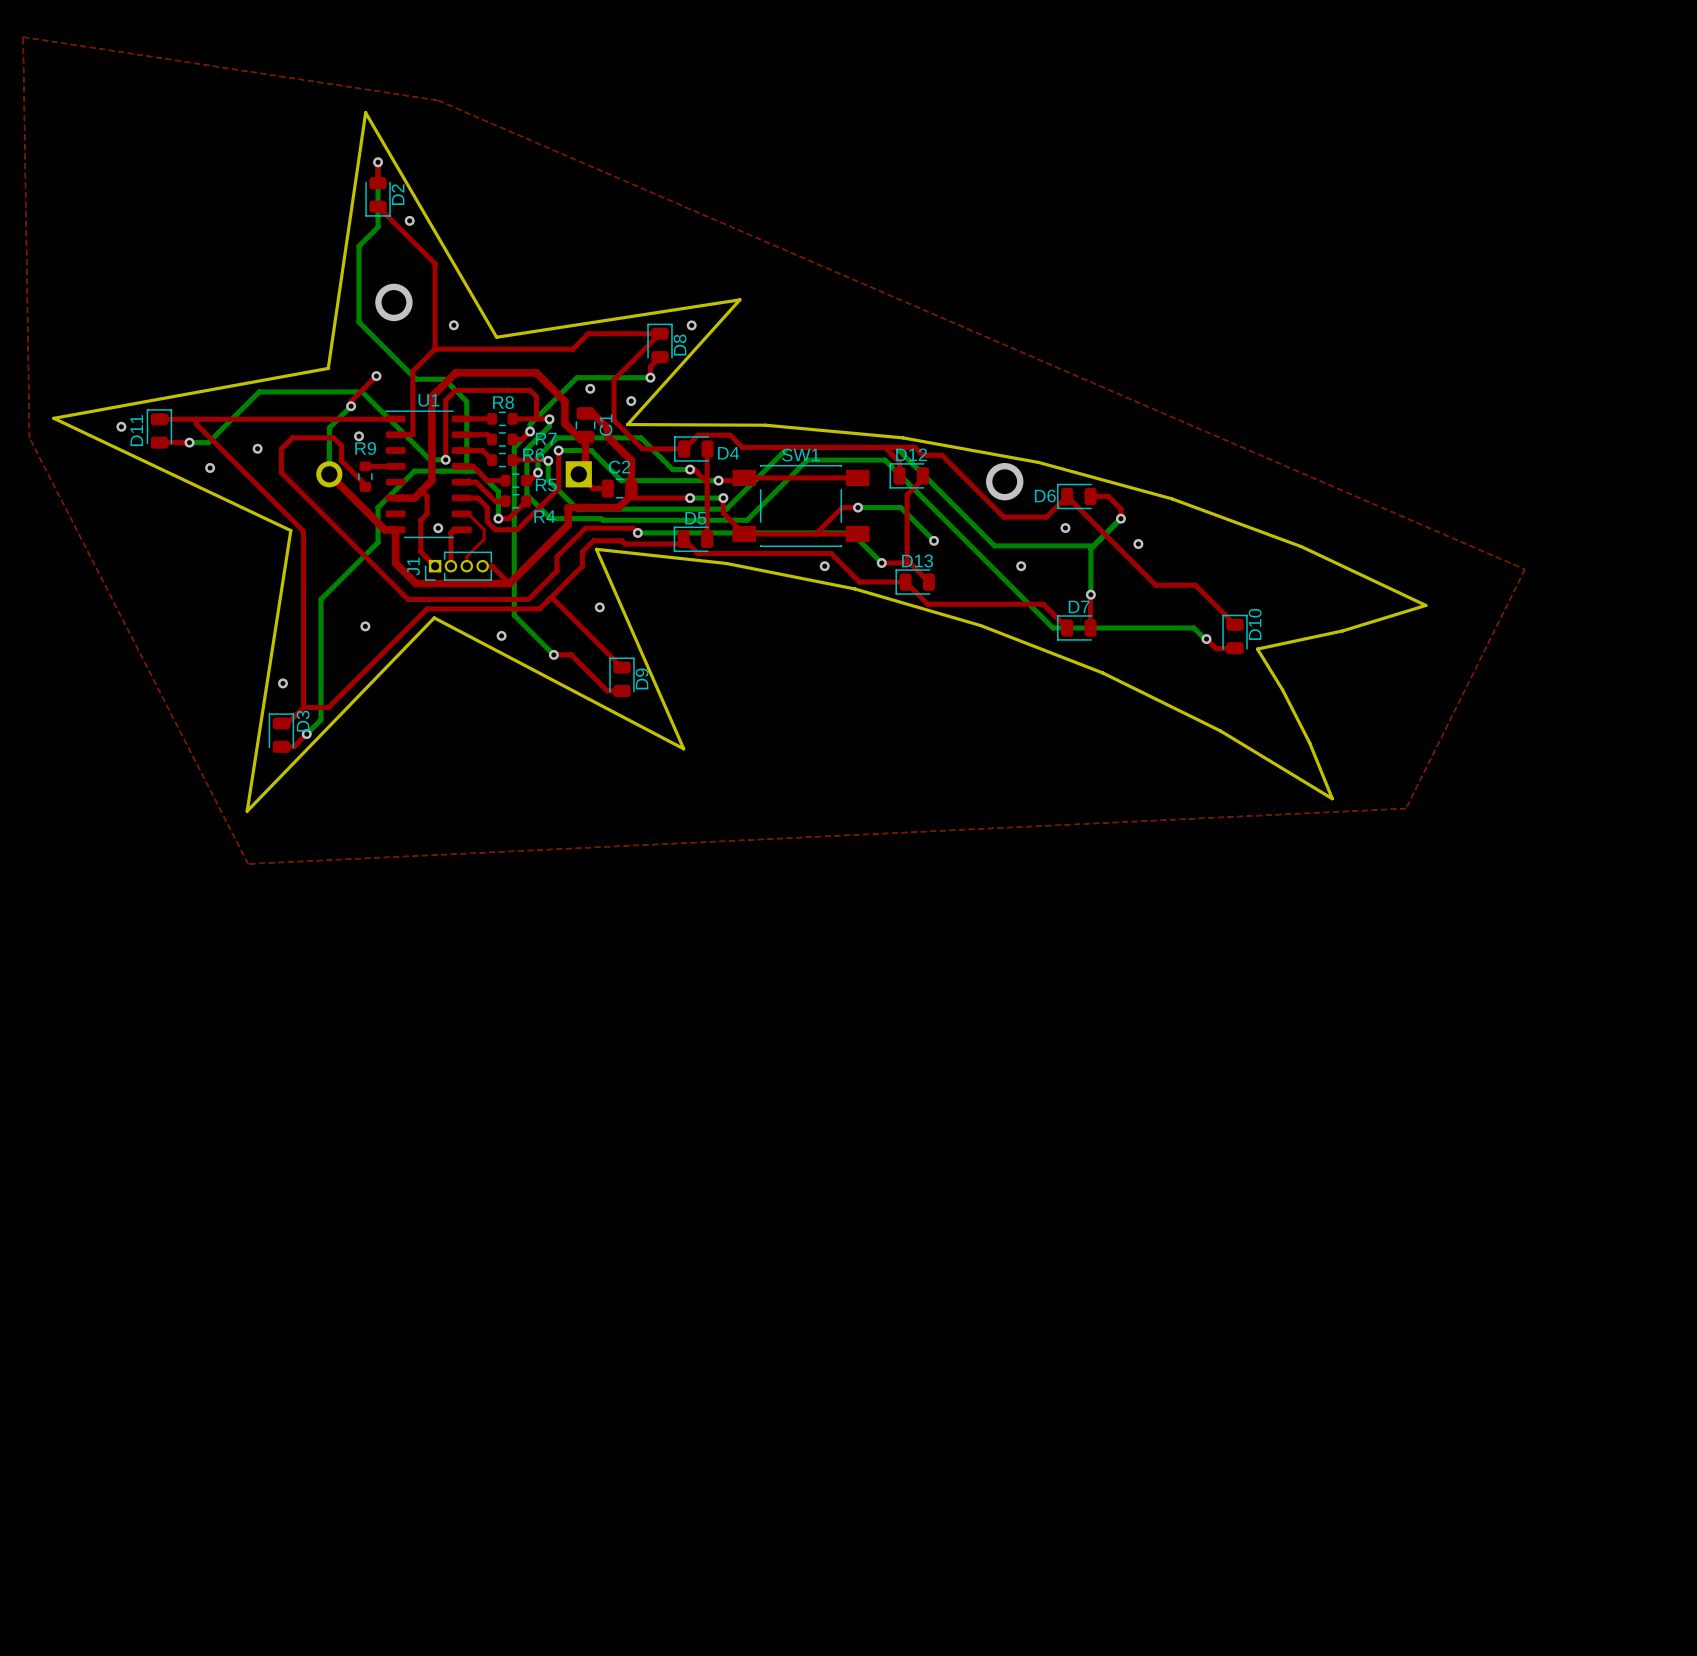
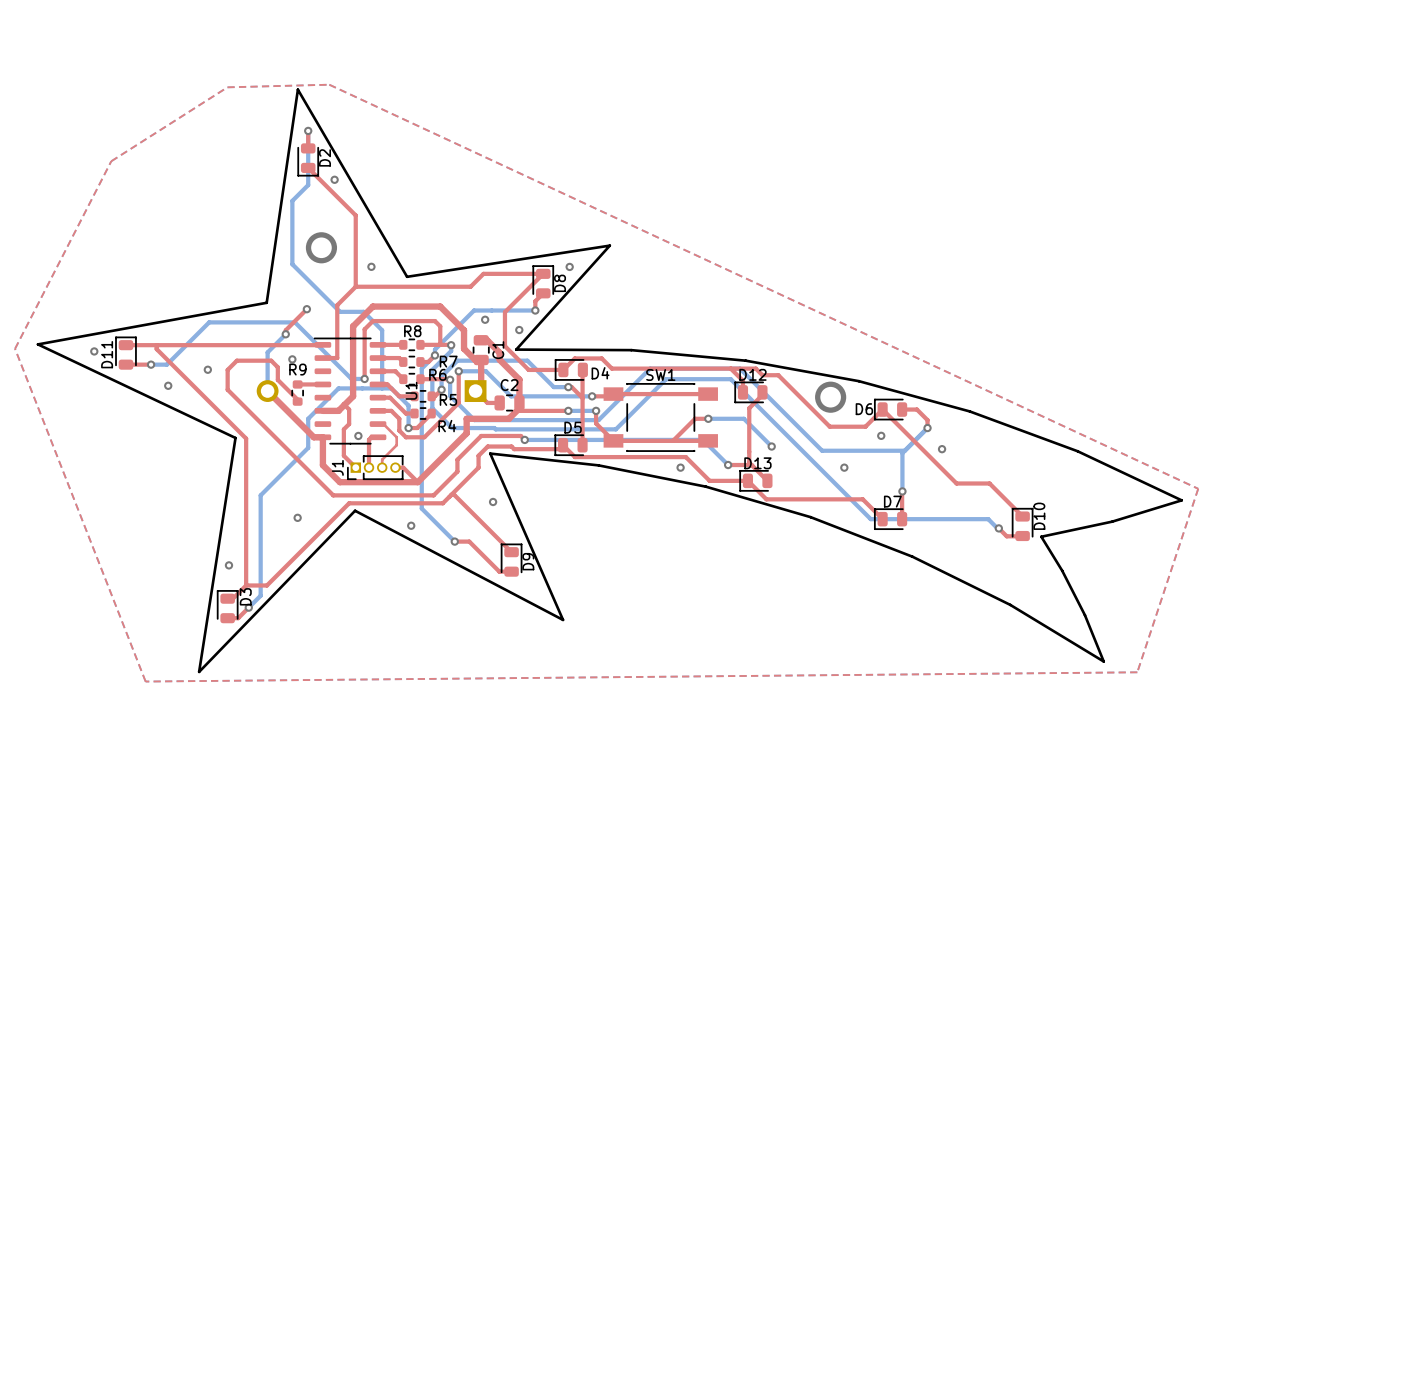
top zone outline: (23, 37) (29, 437) (248, 864) (1406, 808) (1524, 569) (438, 100) (23, 37) -> (329, 84) (227, 87) (111, 161) (15, 348) (145, 681) (1137, 672) (1198, 488) (329, 84)
U1 name rotation: 0° (428, 400) -> 90° counterclockwise (411, 390)
U1 name position: U1 (428, 400) -> U1 (411, 390)

